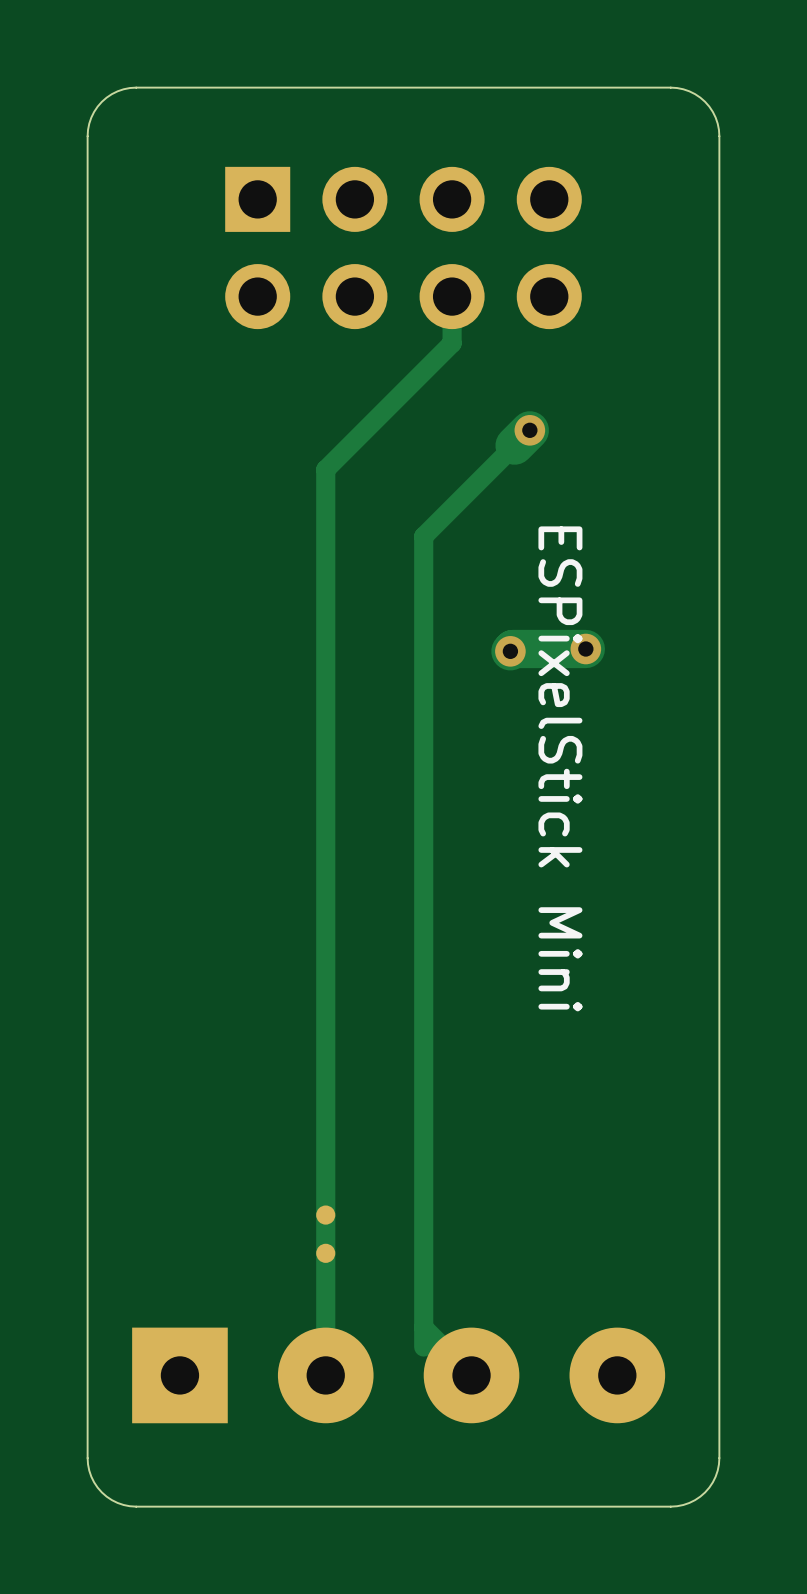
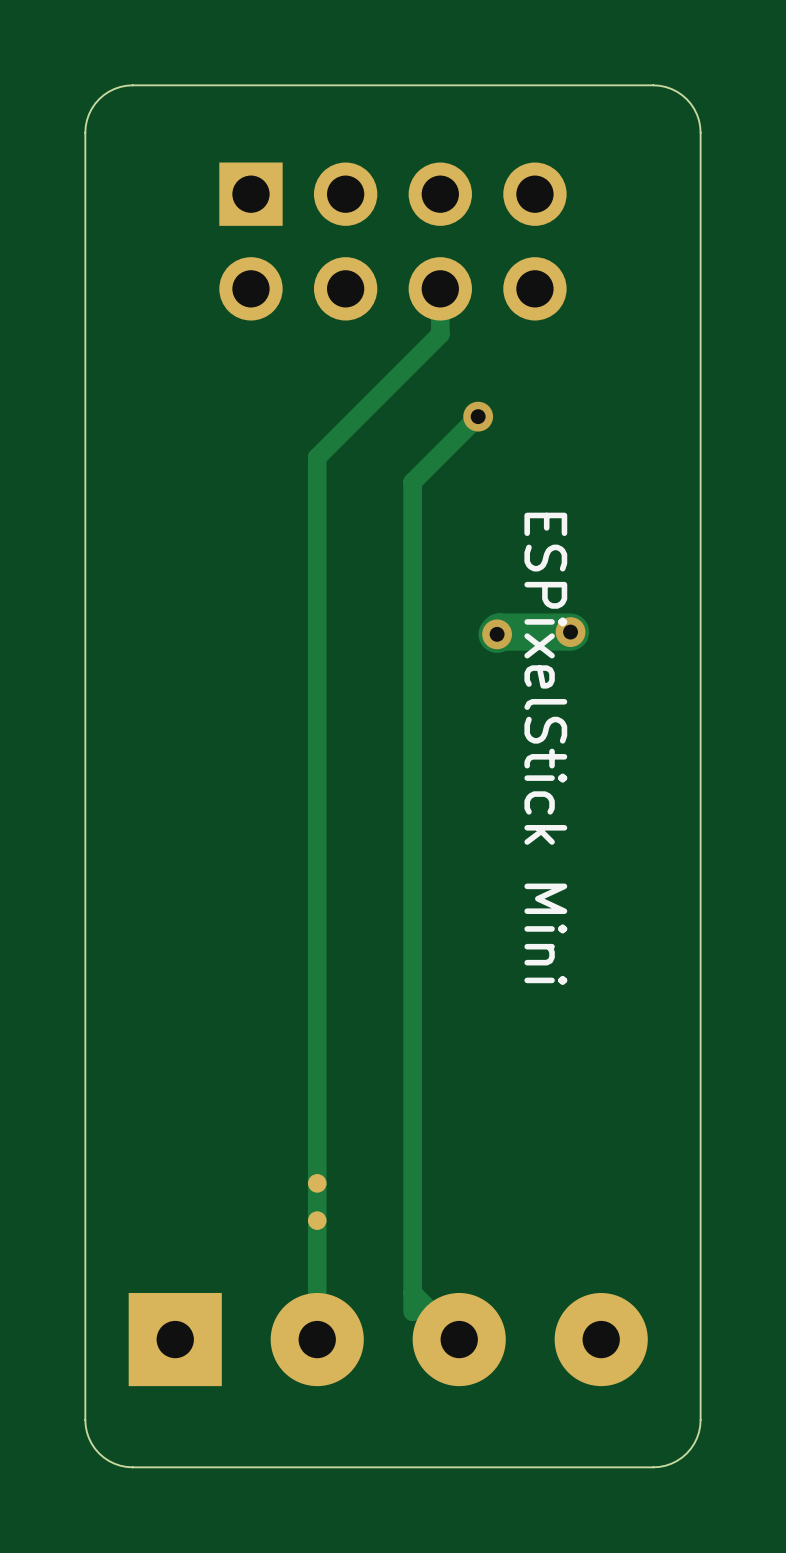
track: (529, 430) (423, 536) -> (478, 416) (412, 482) (412, 522)
via position: (529, 430) -> (478, 416)

